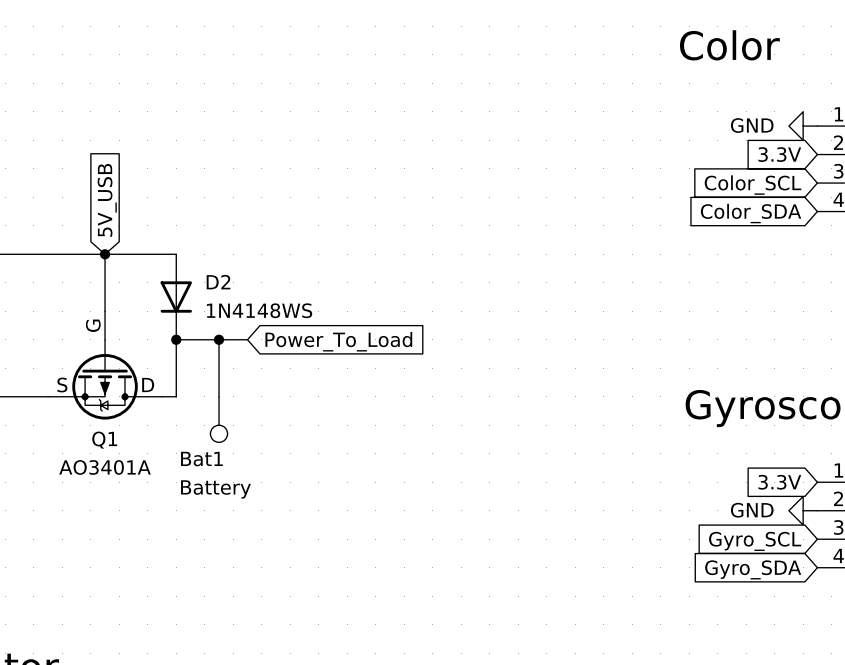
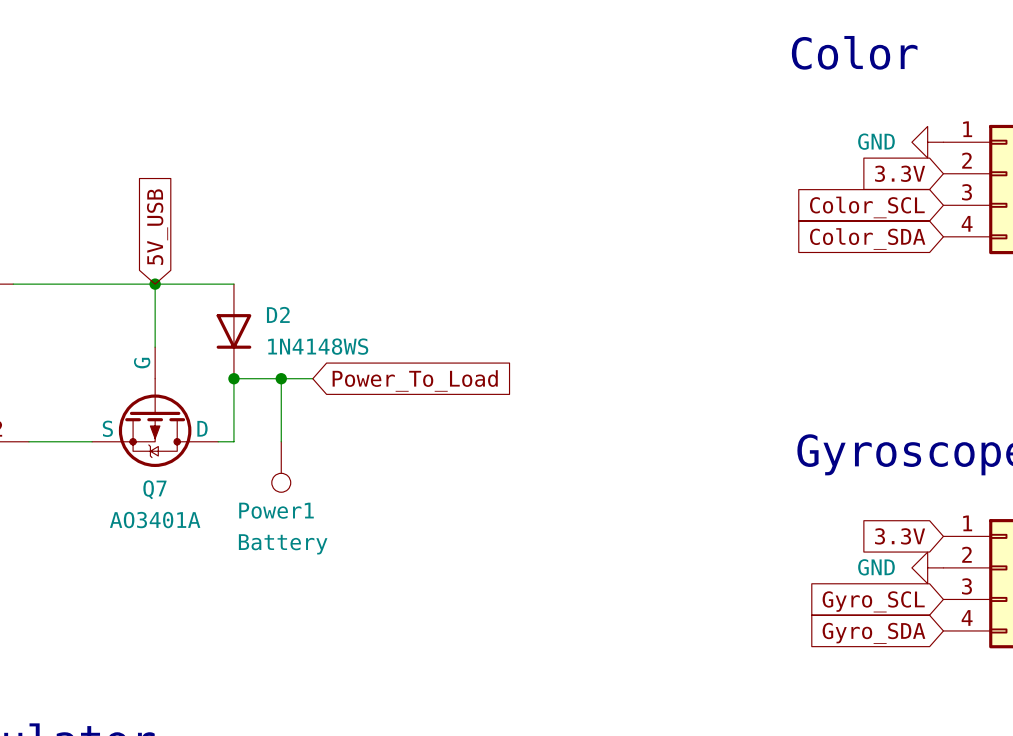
Q1 name: Q1 (104, 440) -> Q7 (154, 489)
Bat1 name: Bat1 (201, 459) -> Power1 (276, 510)

